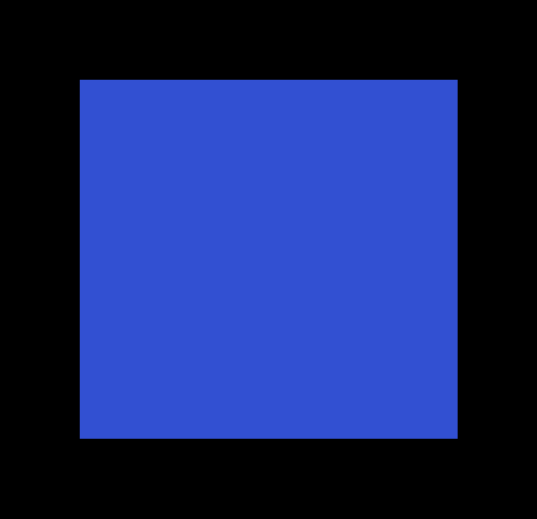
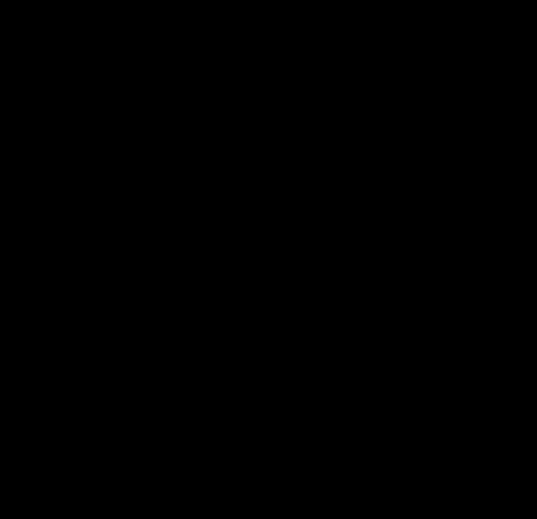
drawing: [79, 79, 458, 439] -> none

